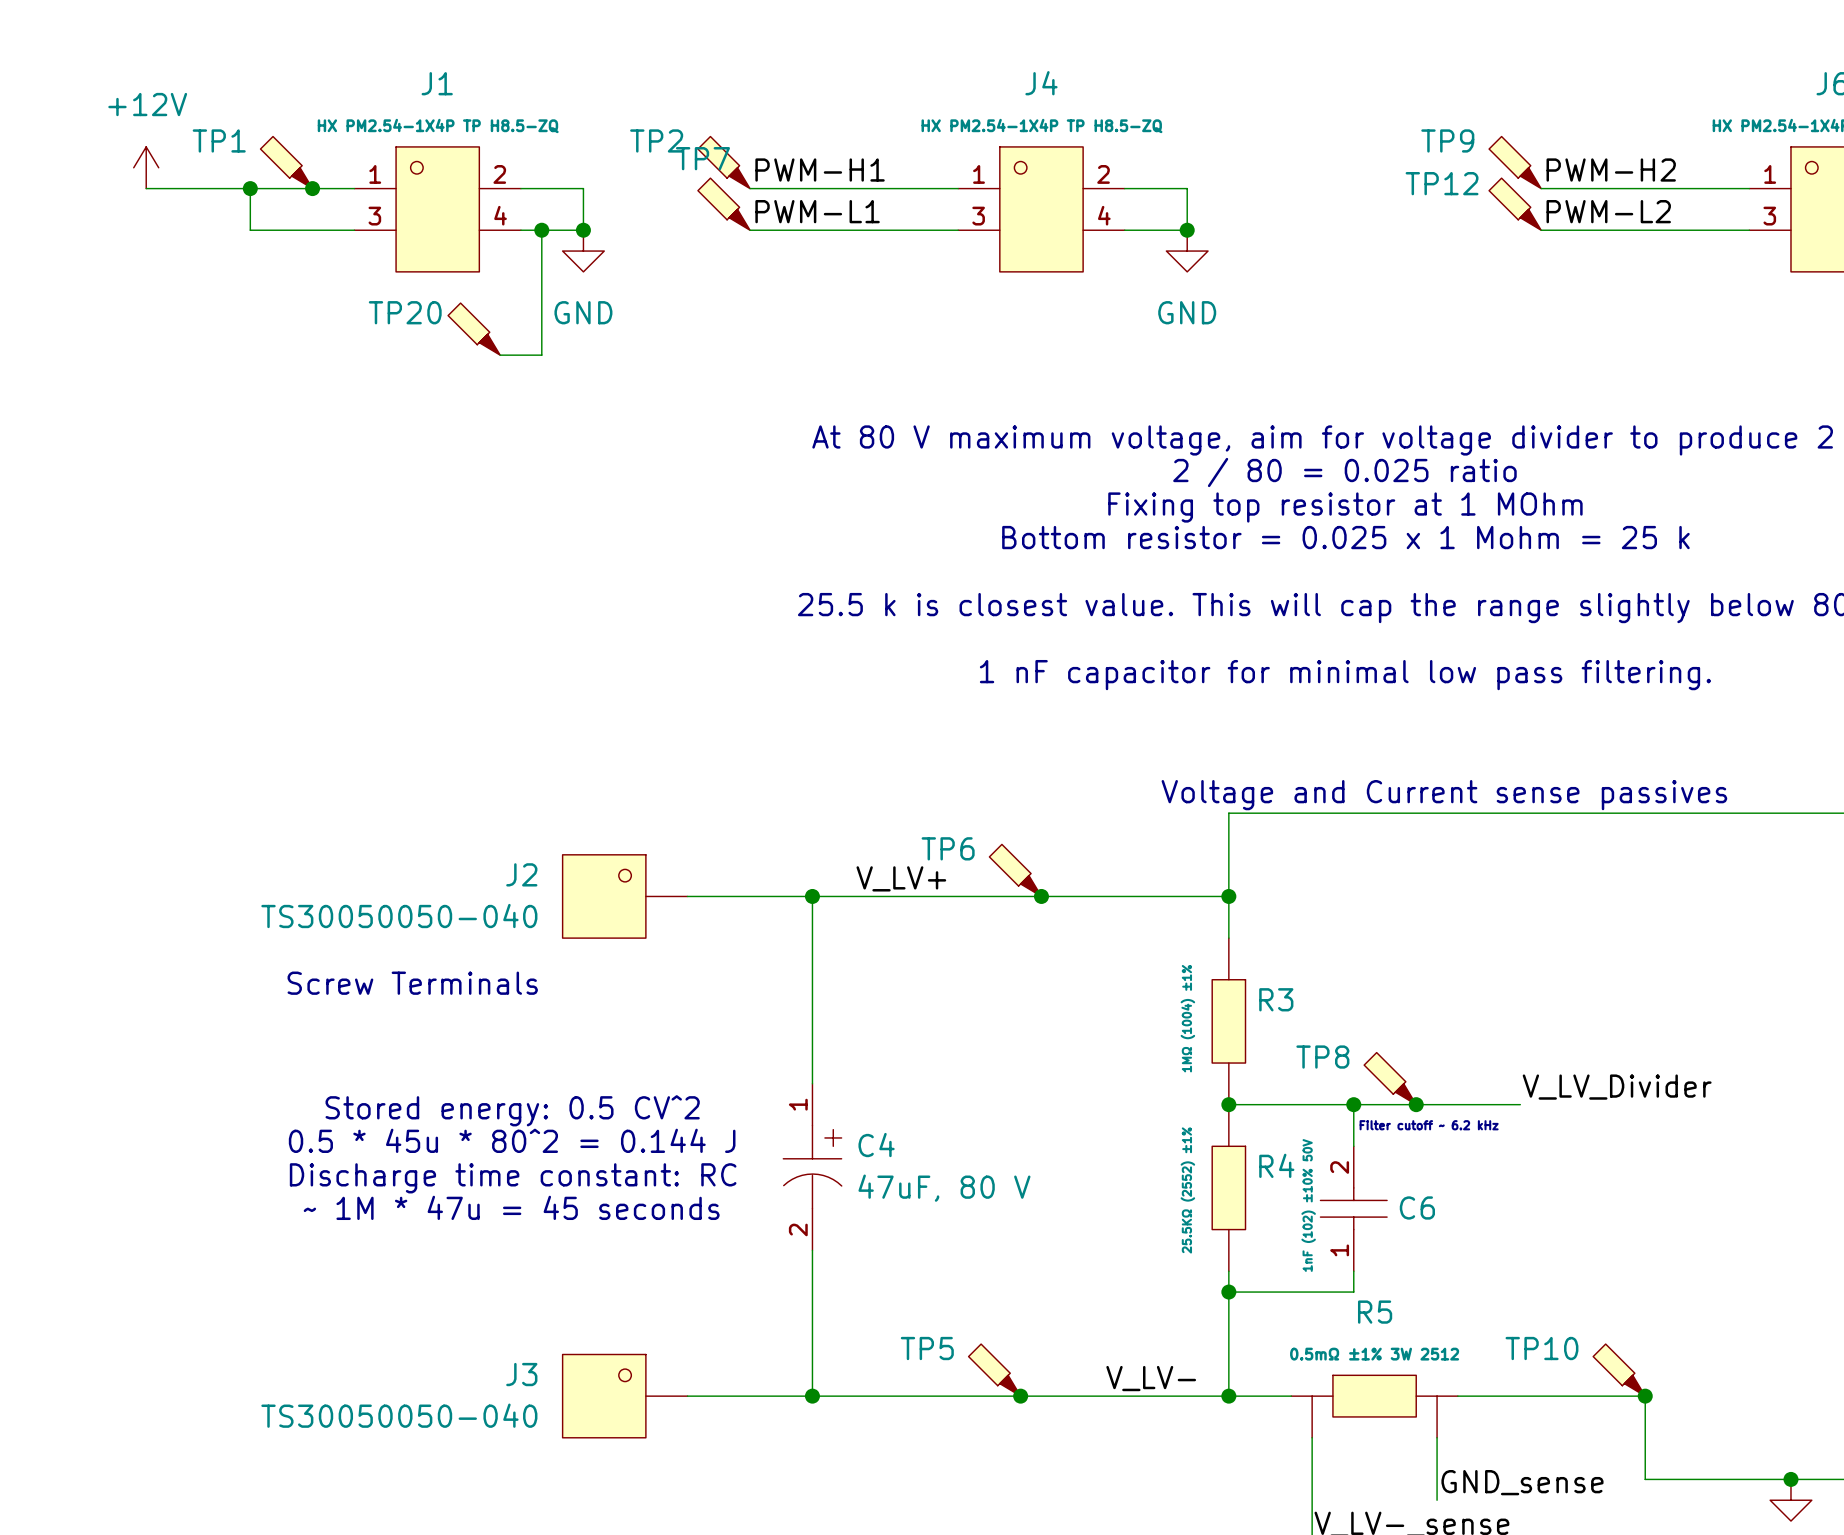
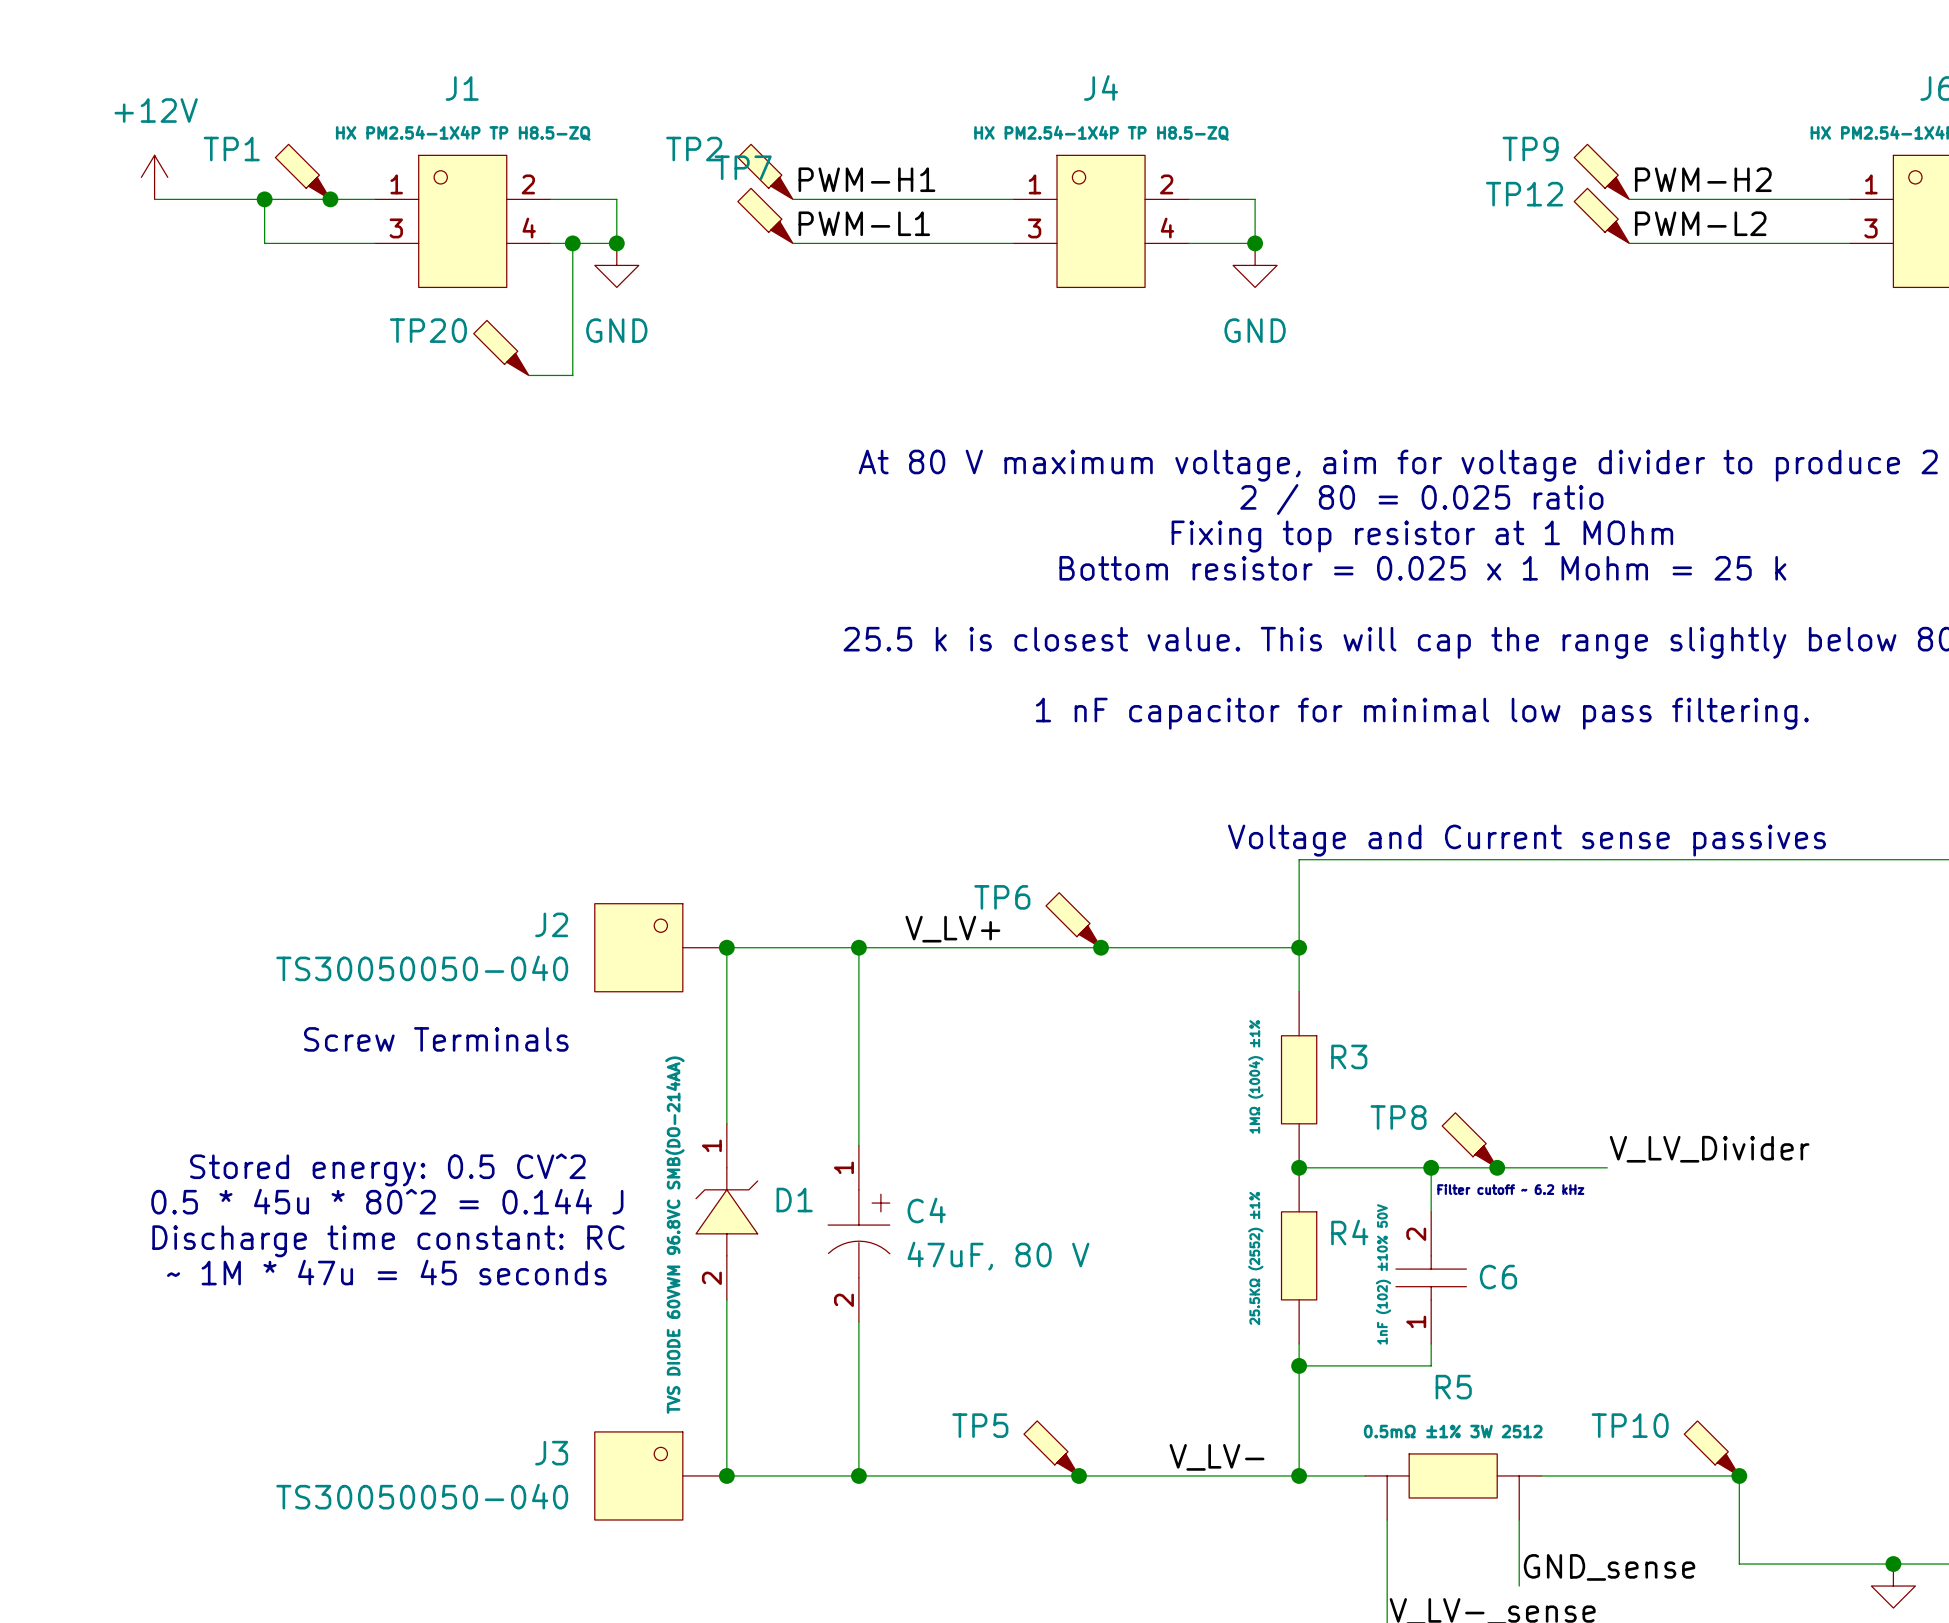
wire: none -> (726, 947) (726, 1123)
junction: none -> (726, 947)
text position: Stored energy: 0.5 CV^2 (512, 1110) -> Stored energy: 0.5 CV^2 (387, 1169)
text position: 0.5 * 45u * 80^2 = 0.144 J (512, 1140) -> 0.5 * 45u * 80^2 = 0.144 J (387, 1201)
D1: none -> TVS DIODE 60VWM 96.8VC SMB(DO-214AA) (726, 1211)
text position: Discharge time constant: RC (513, 1178) -> Discharge time constant: RC (388, 1241)
text position: ~ 1M * 47u = 45 seconds (511, 1207) -> ~ 1M * 47u = 45 seconds (386, 1272)
wire: none -> (726, 1299) (726, 1475)
junction: none -> (726, 1475)

